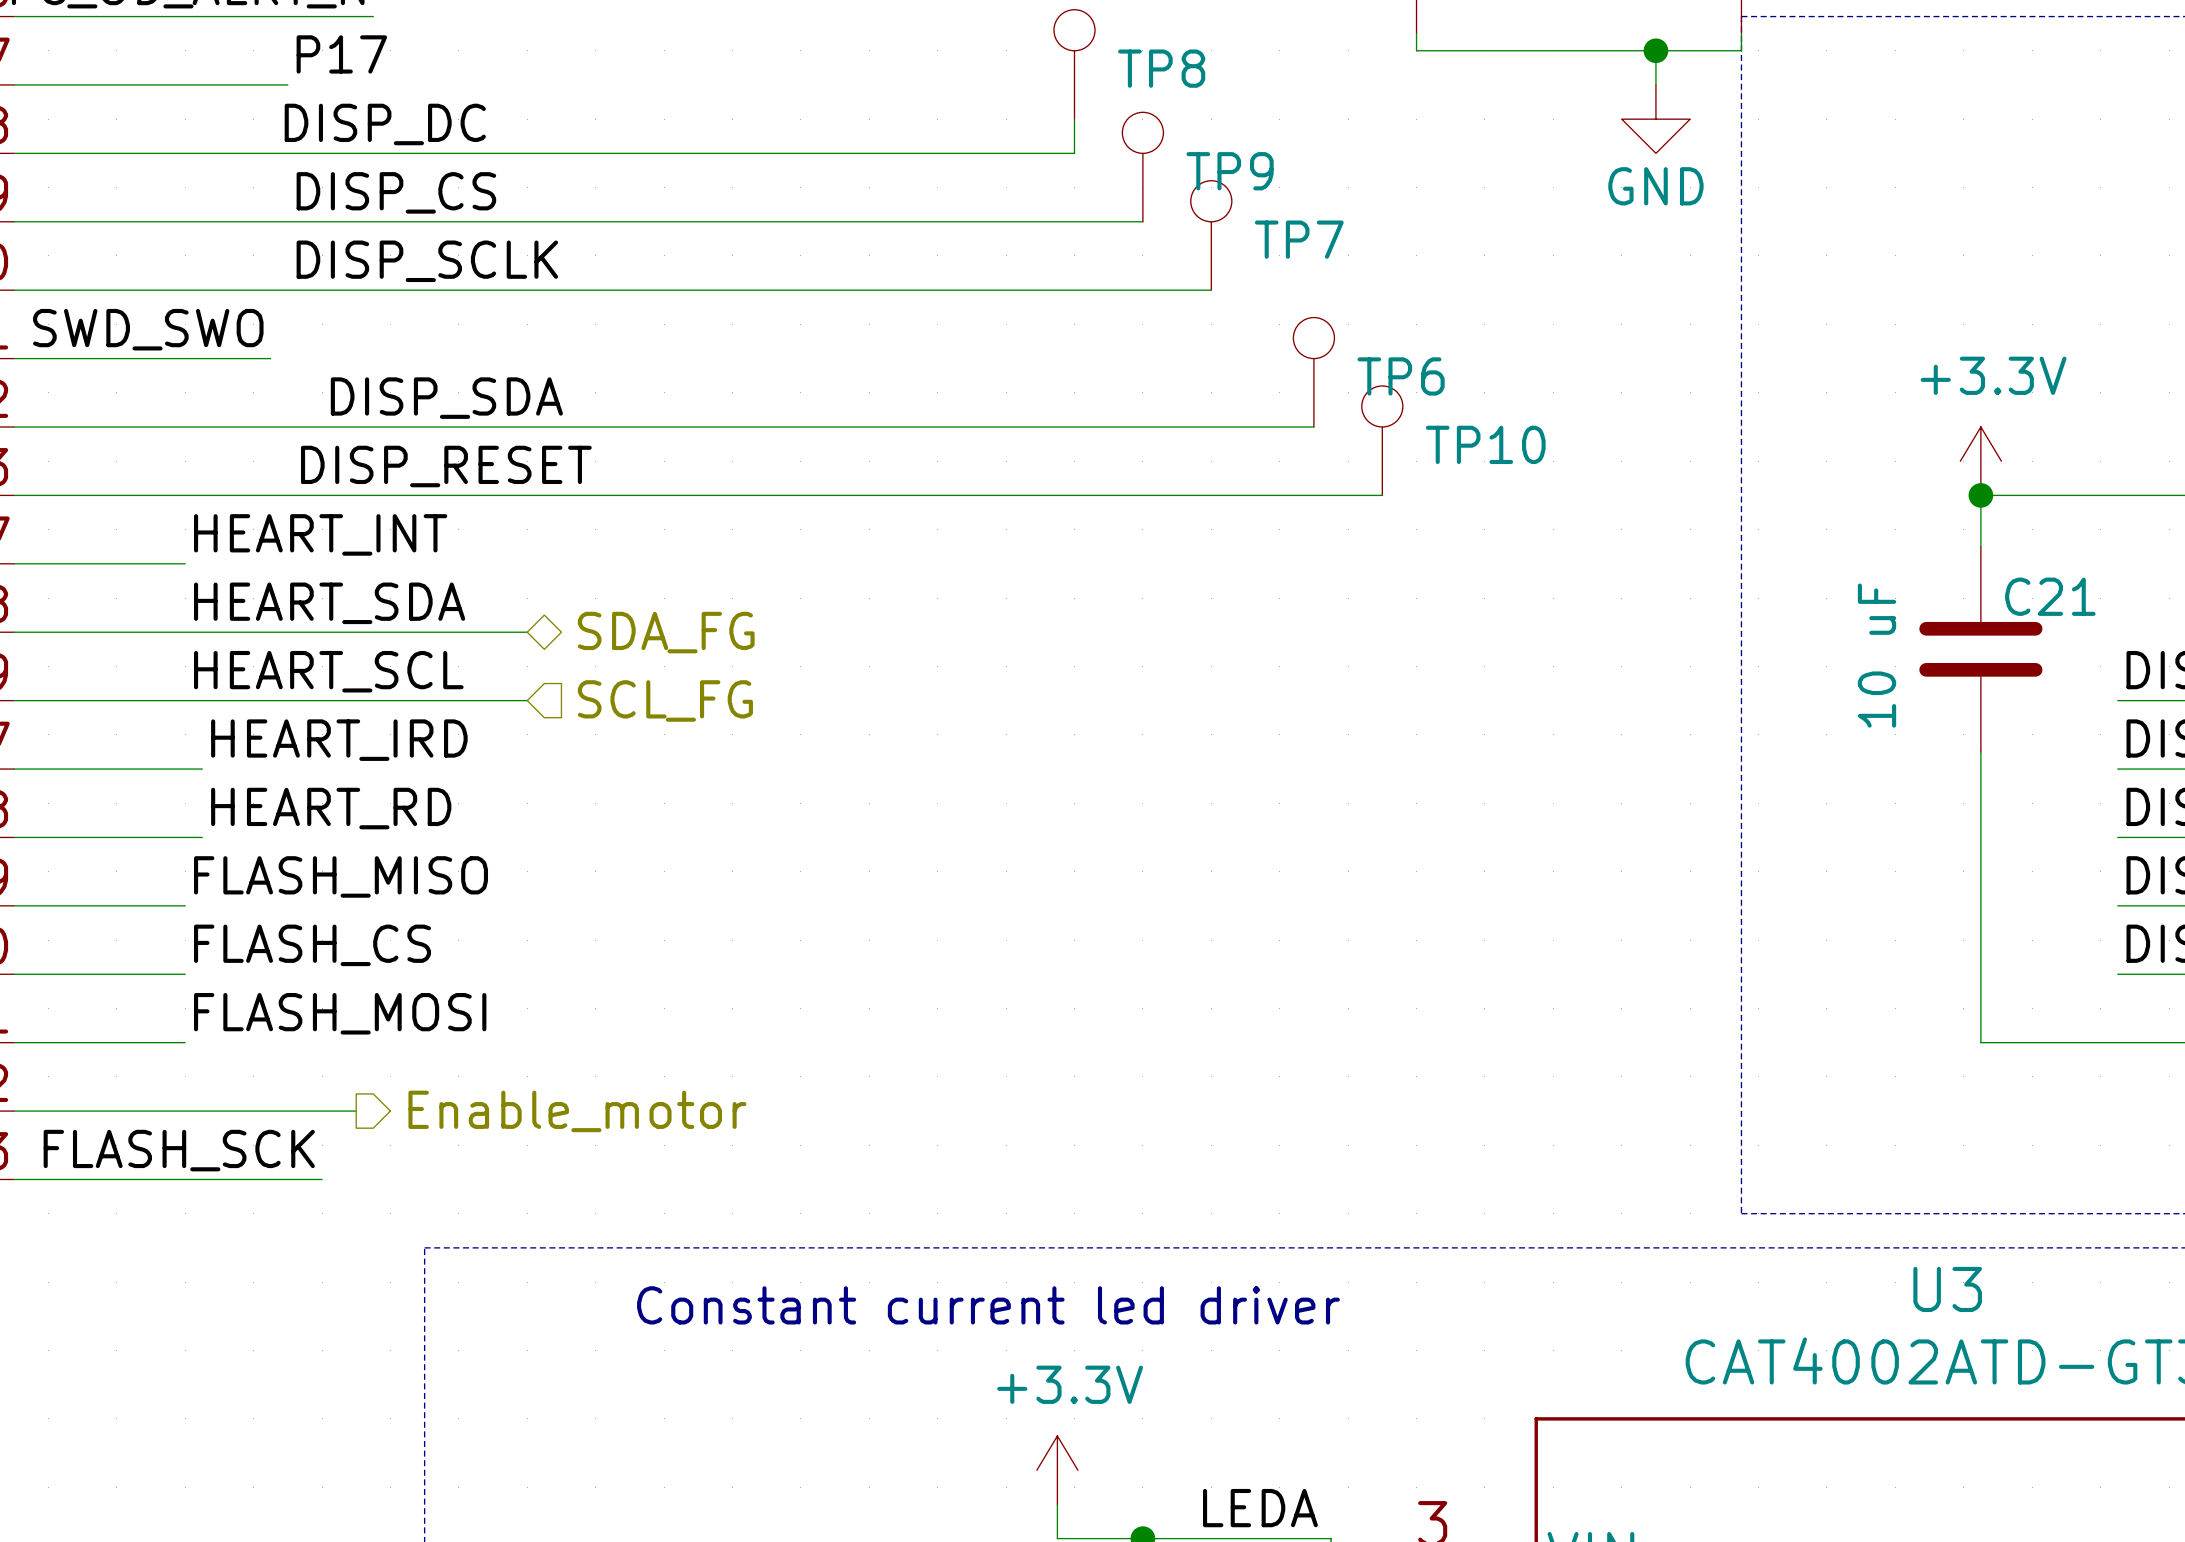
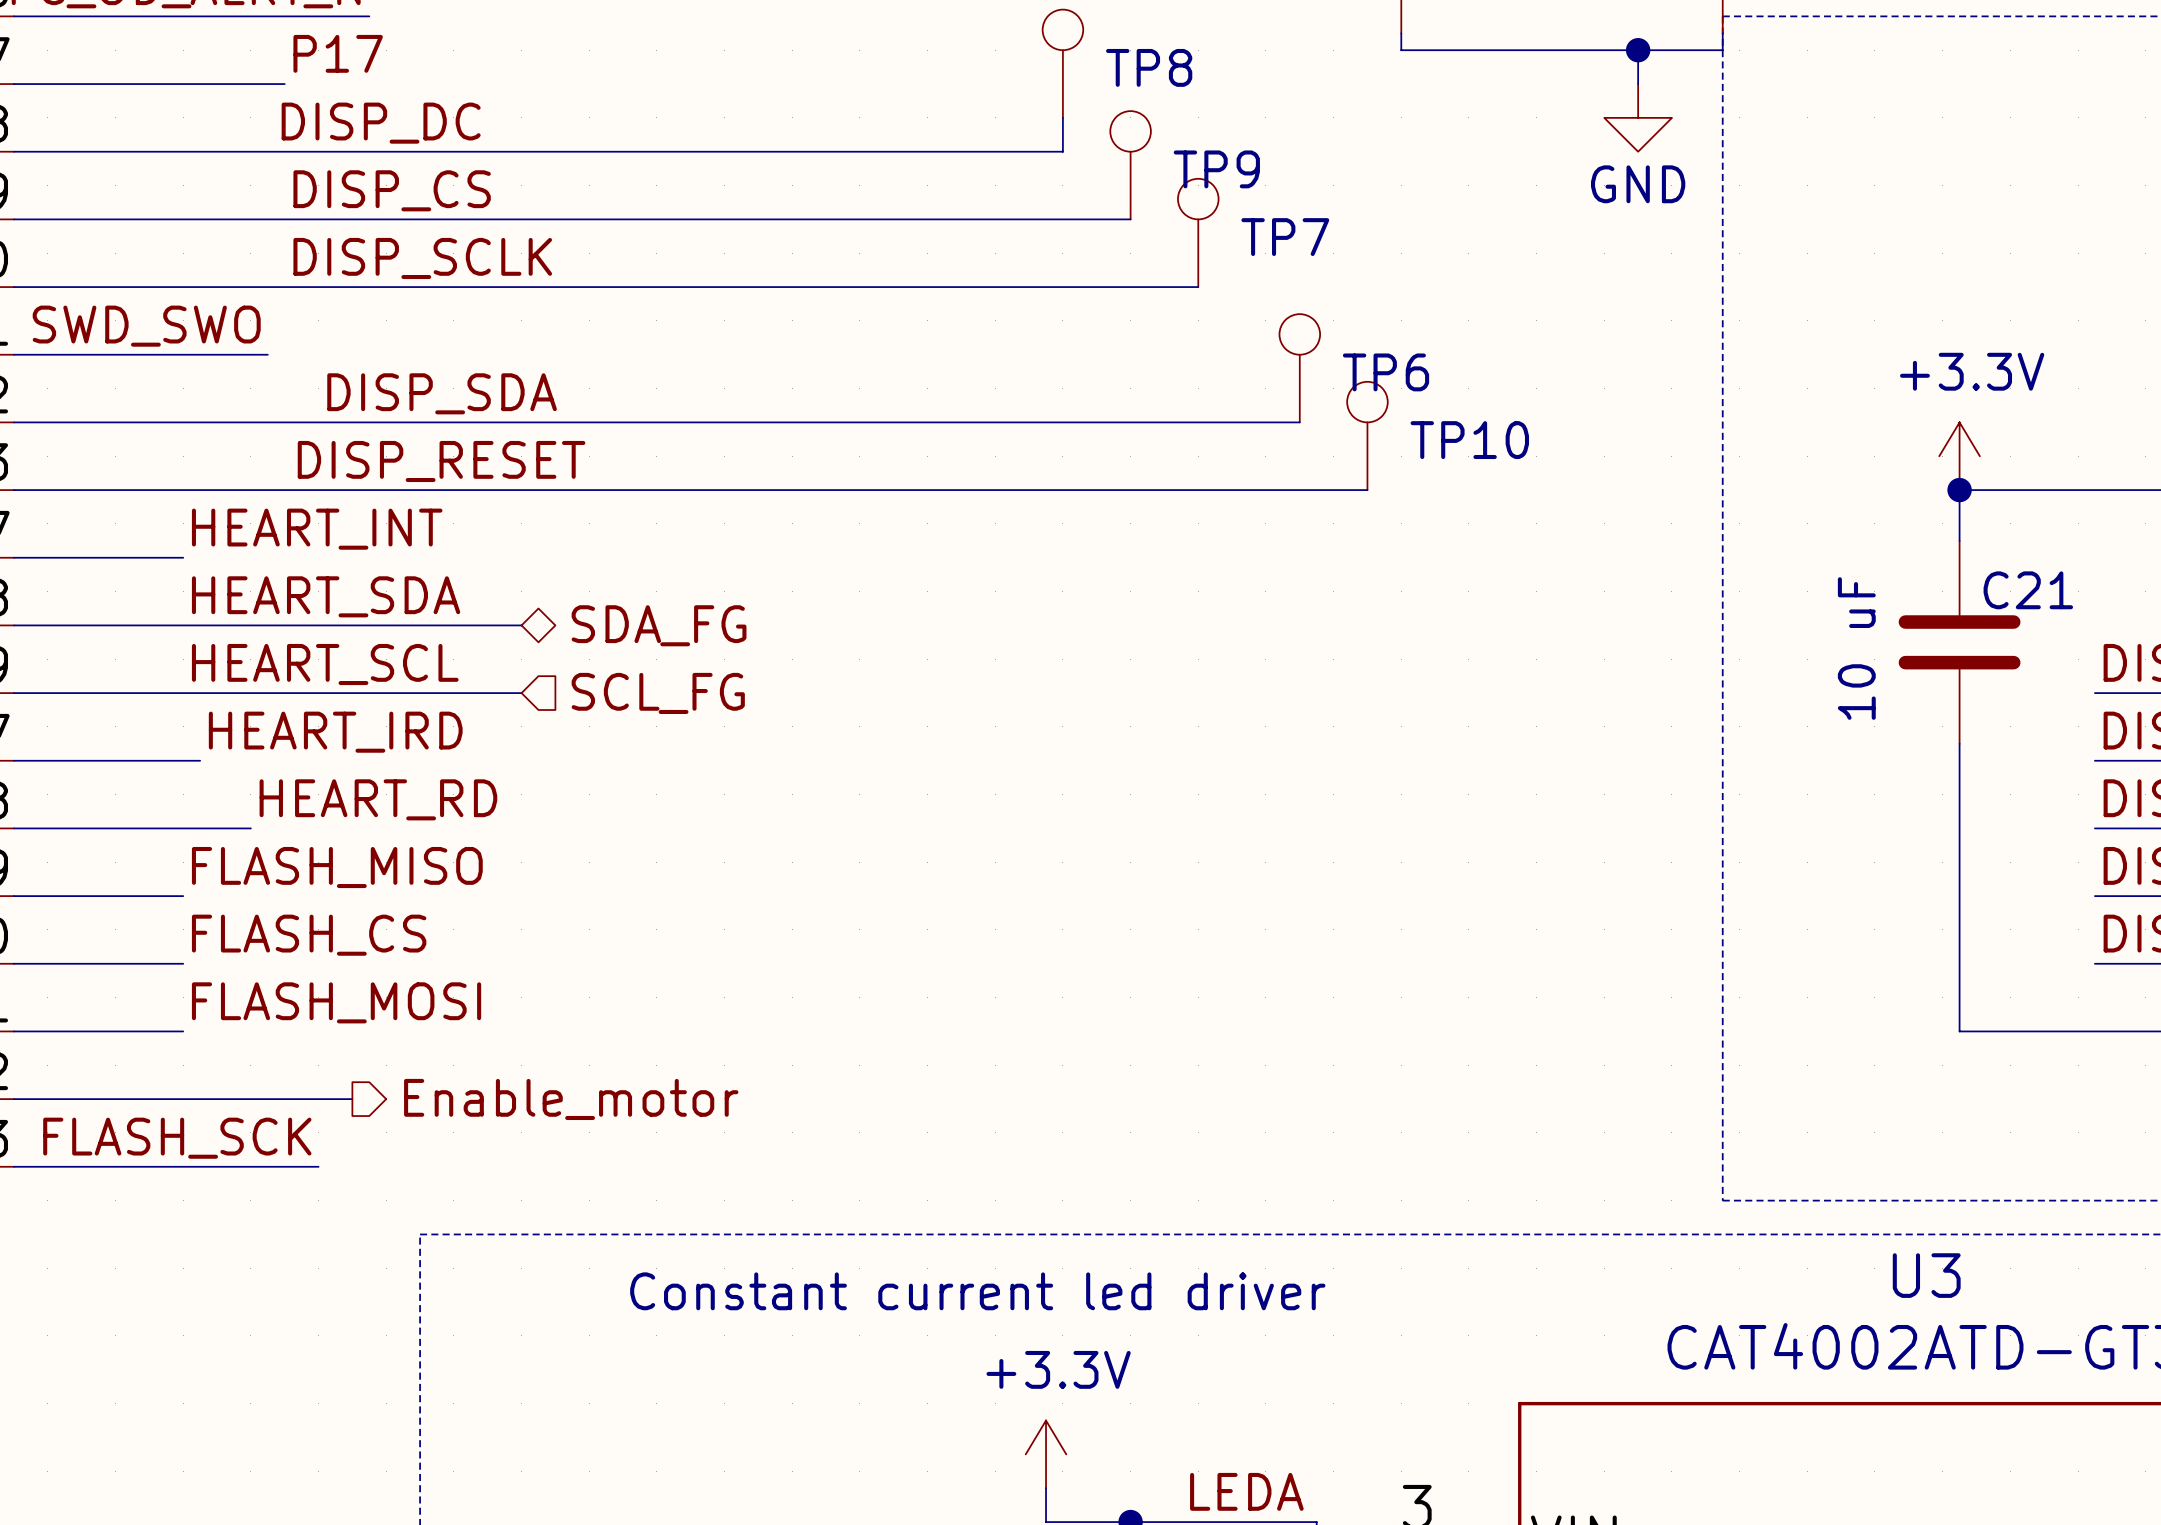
label position: HEART_RD (331, 808) -> HEART_RD (378, 799)
wire: none -> (200, 828) (250, 828)

